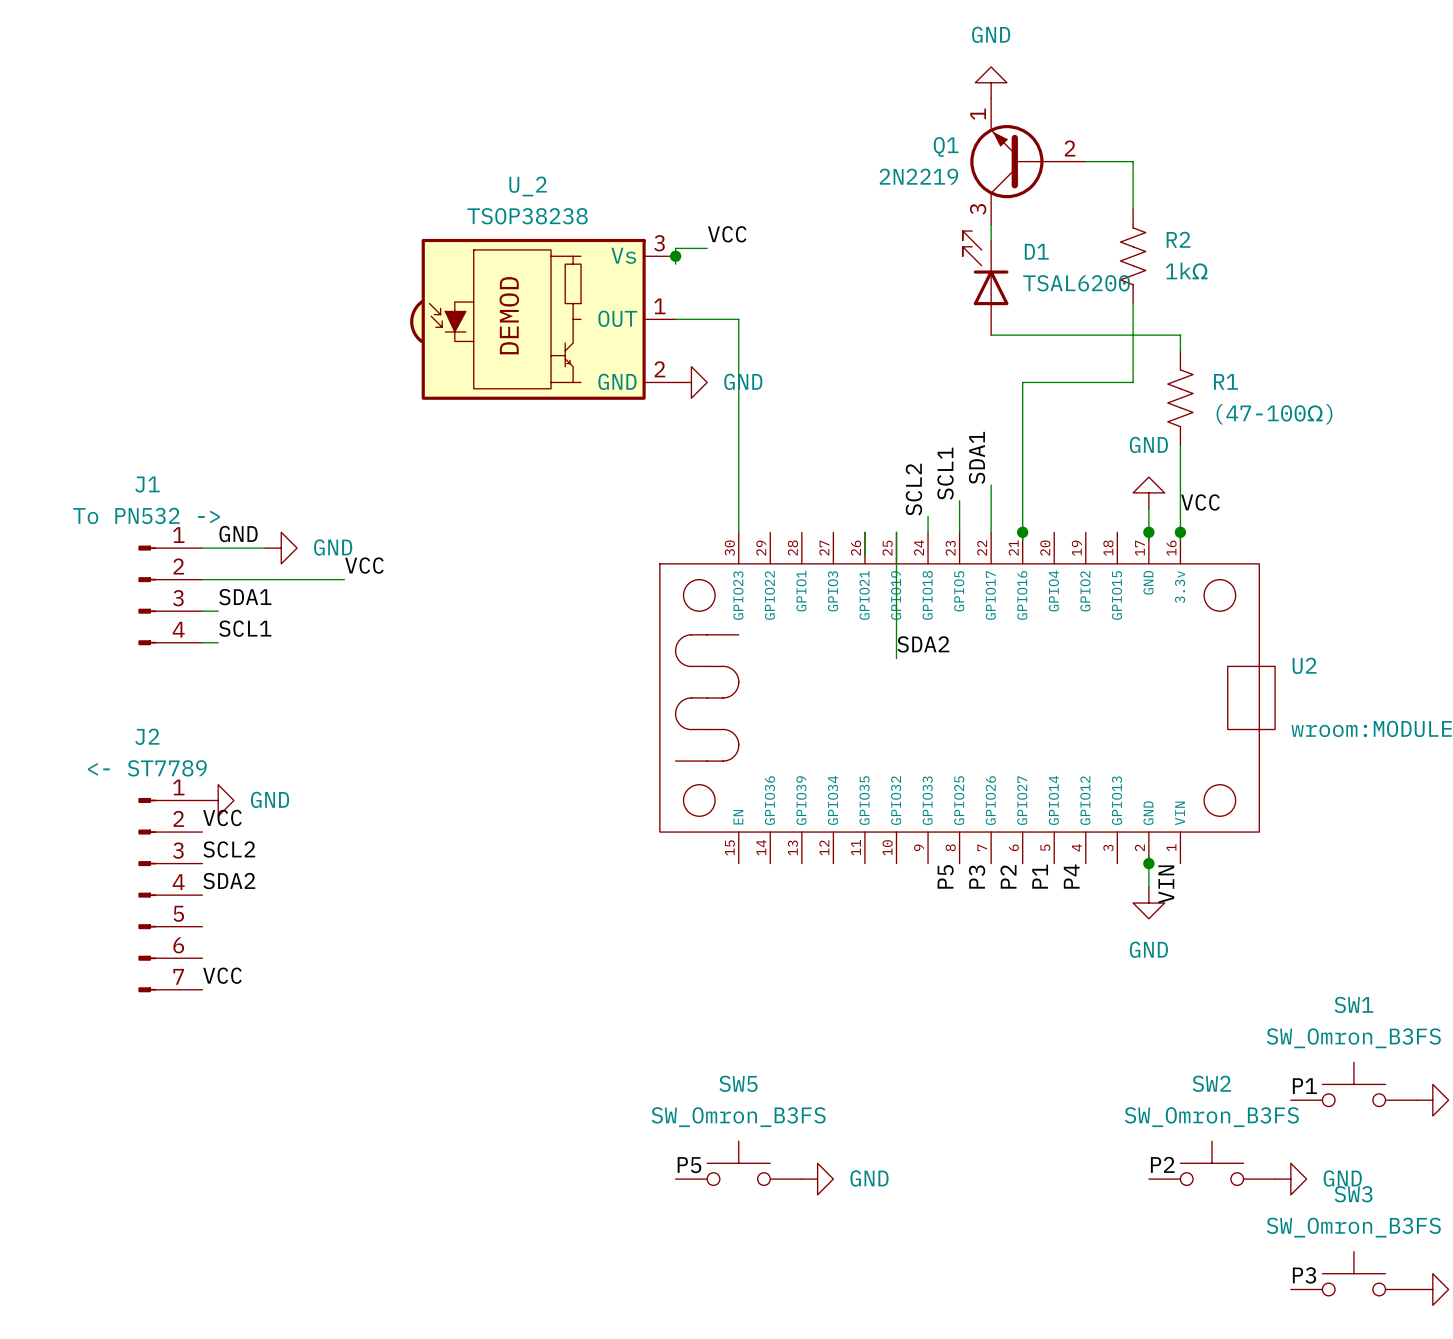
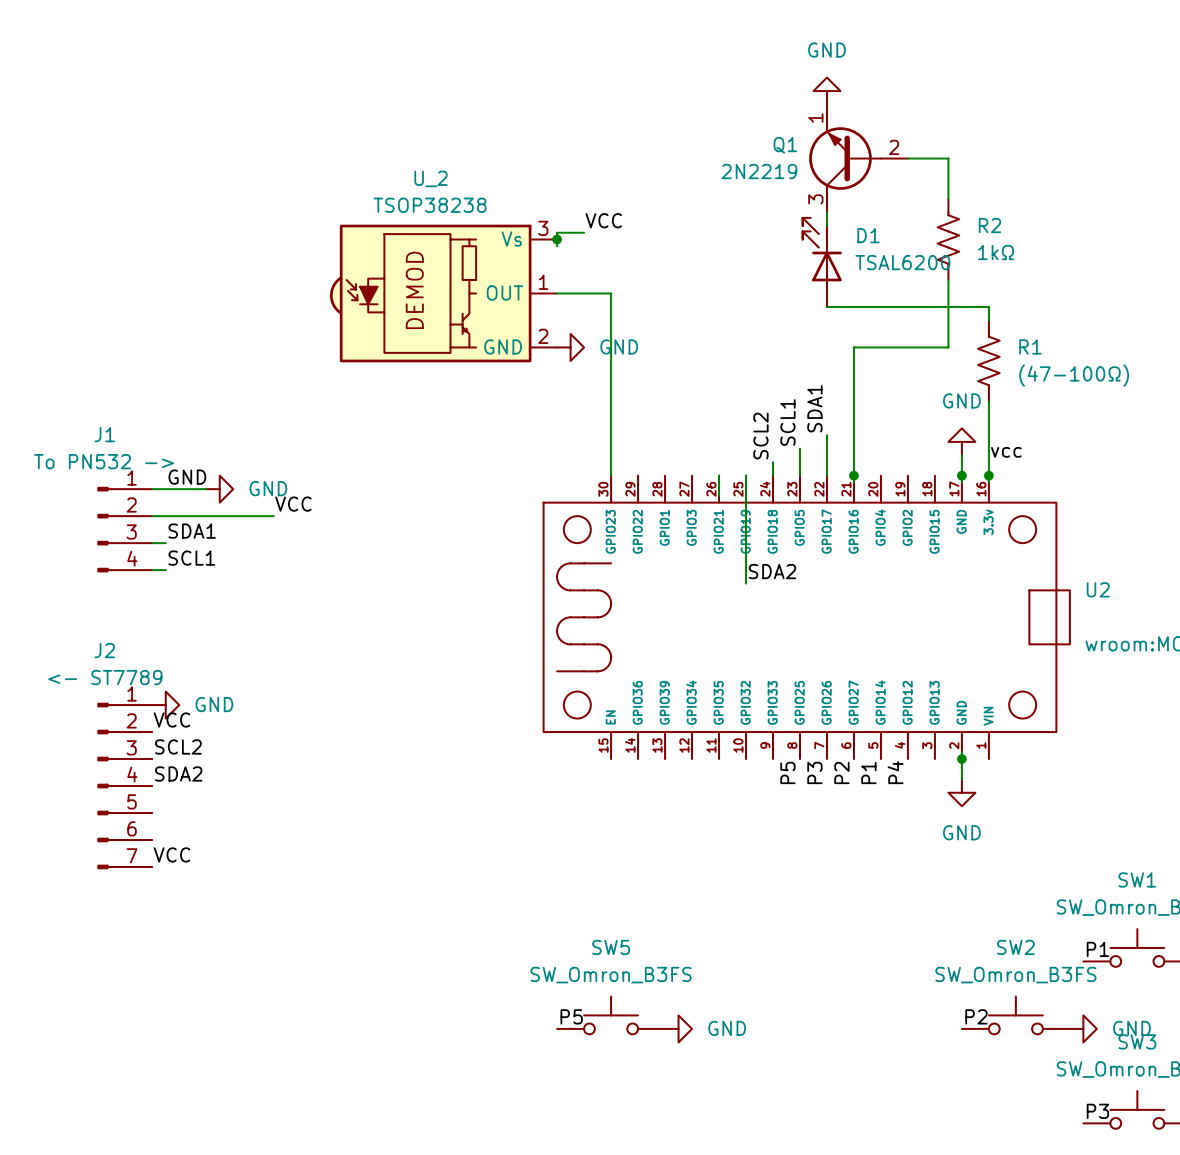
label: VCC (1200, 502) -> vcc (1006, 452)
label: VIN (1166, 884) -> none

